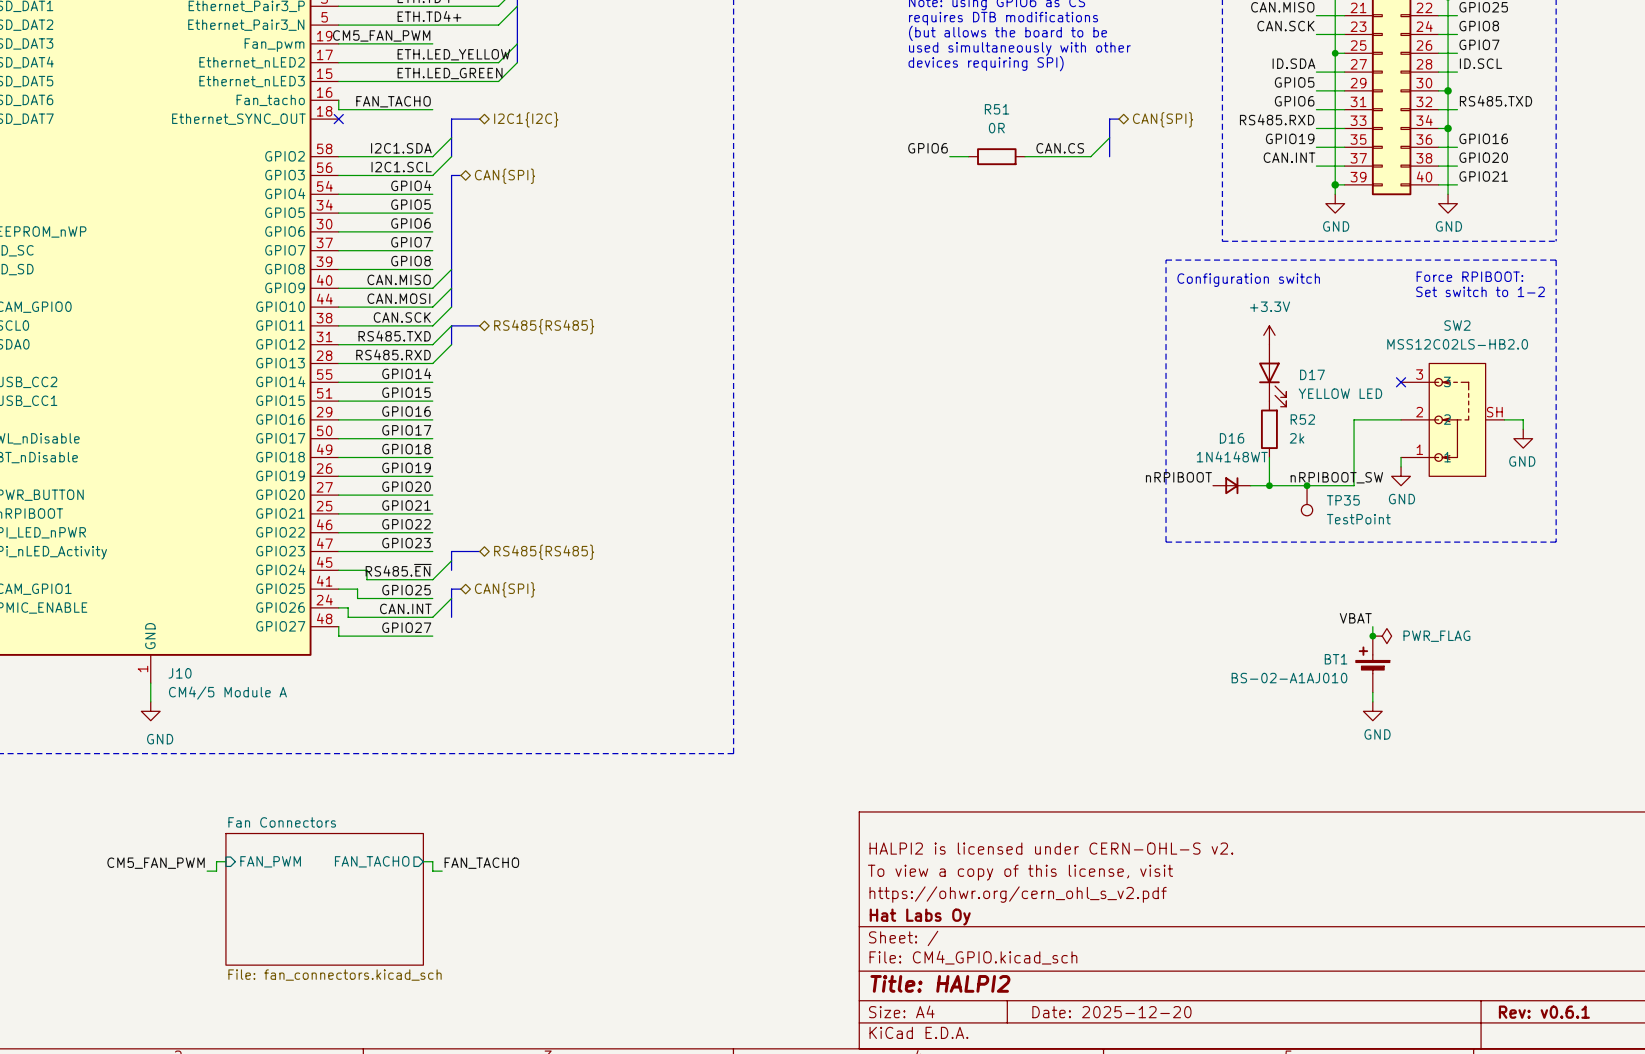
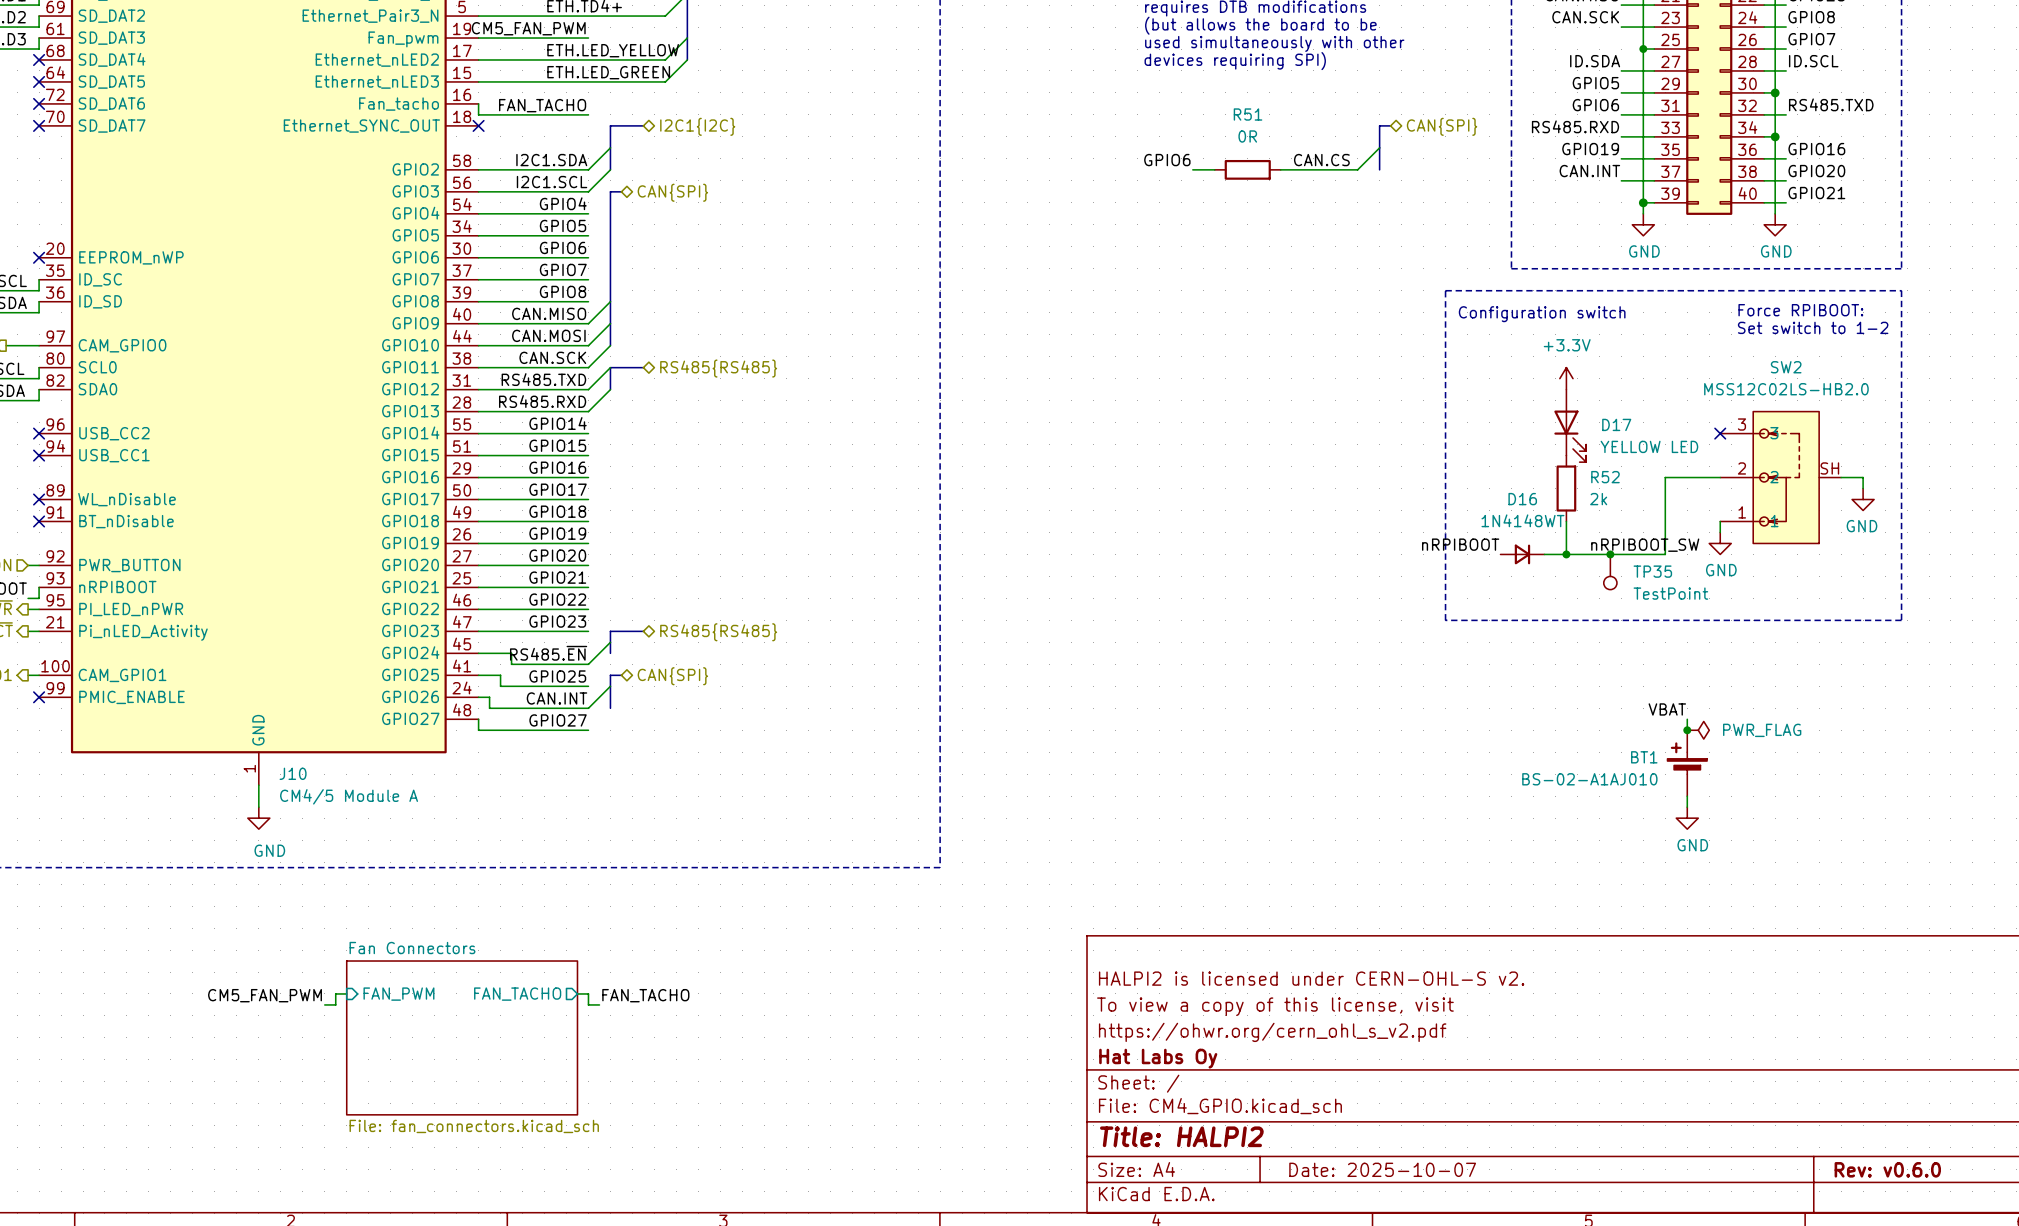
title block: Date: 2025-12-20 (1111, 1012) -> Date: 2025-10-07 (1382, 1169)
title block: Rev: v0.6.1 (1544, 1012) -> Rev: v0.6.0 (1887, 1169)

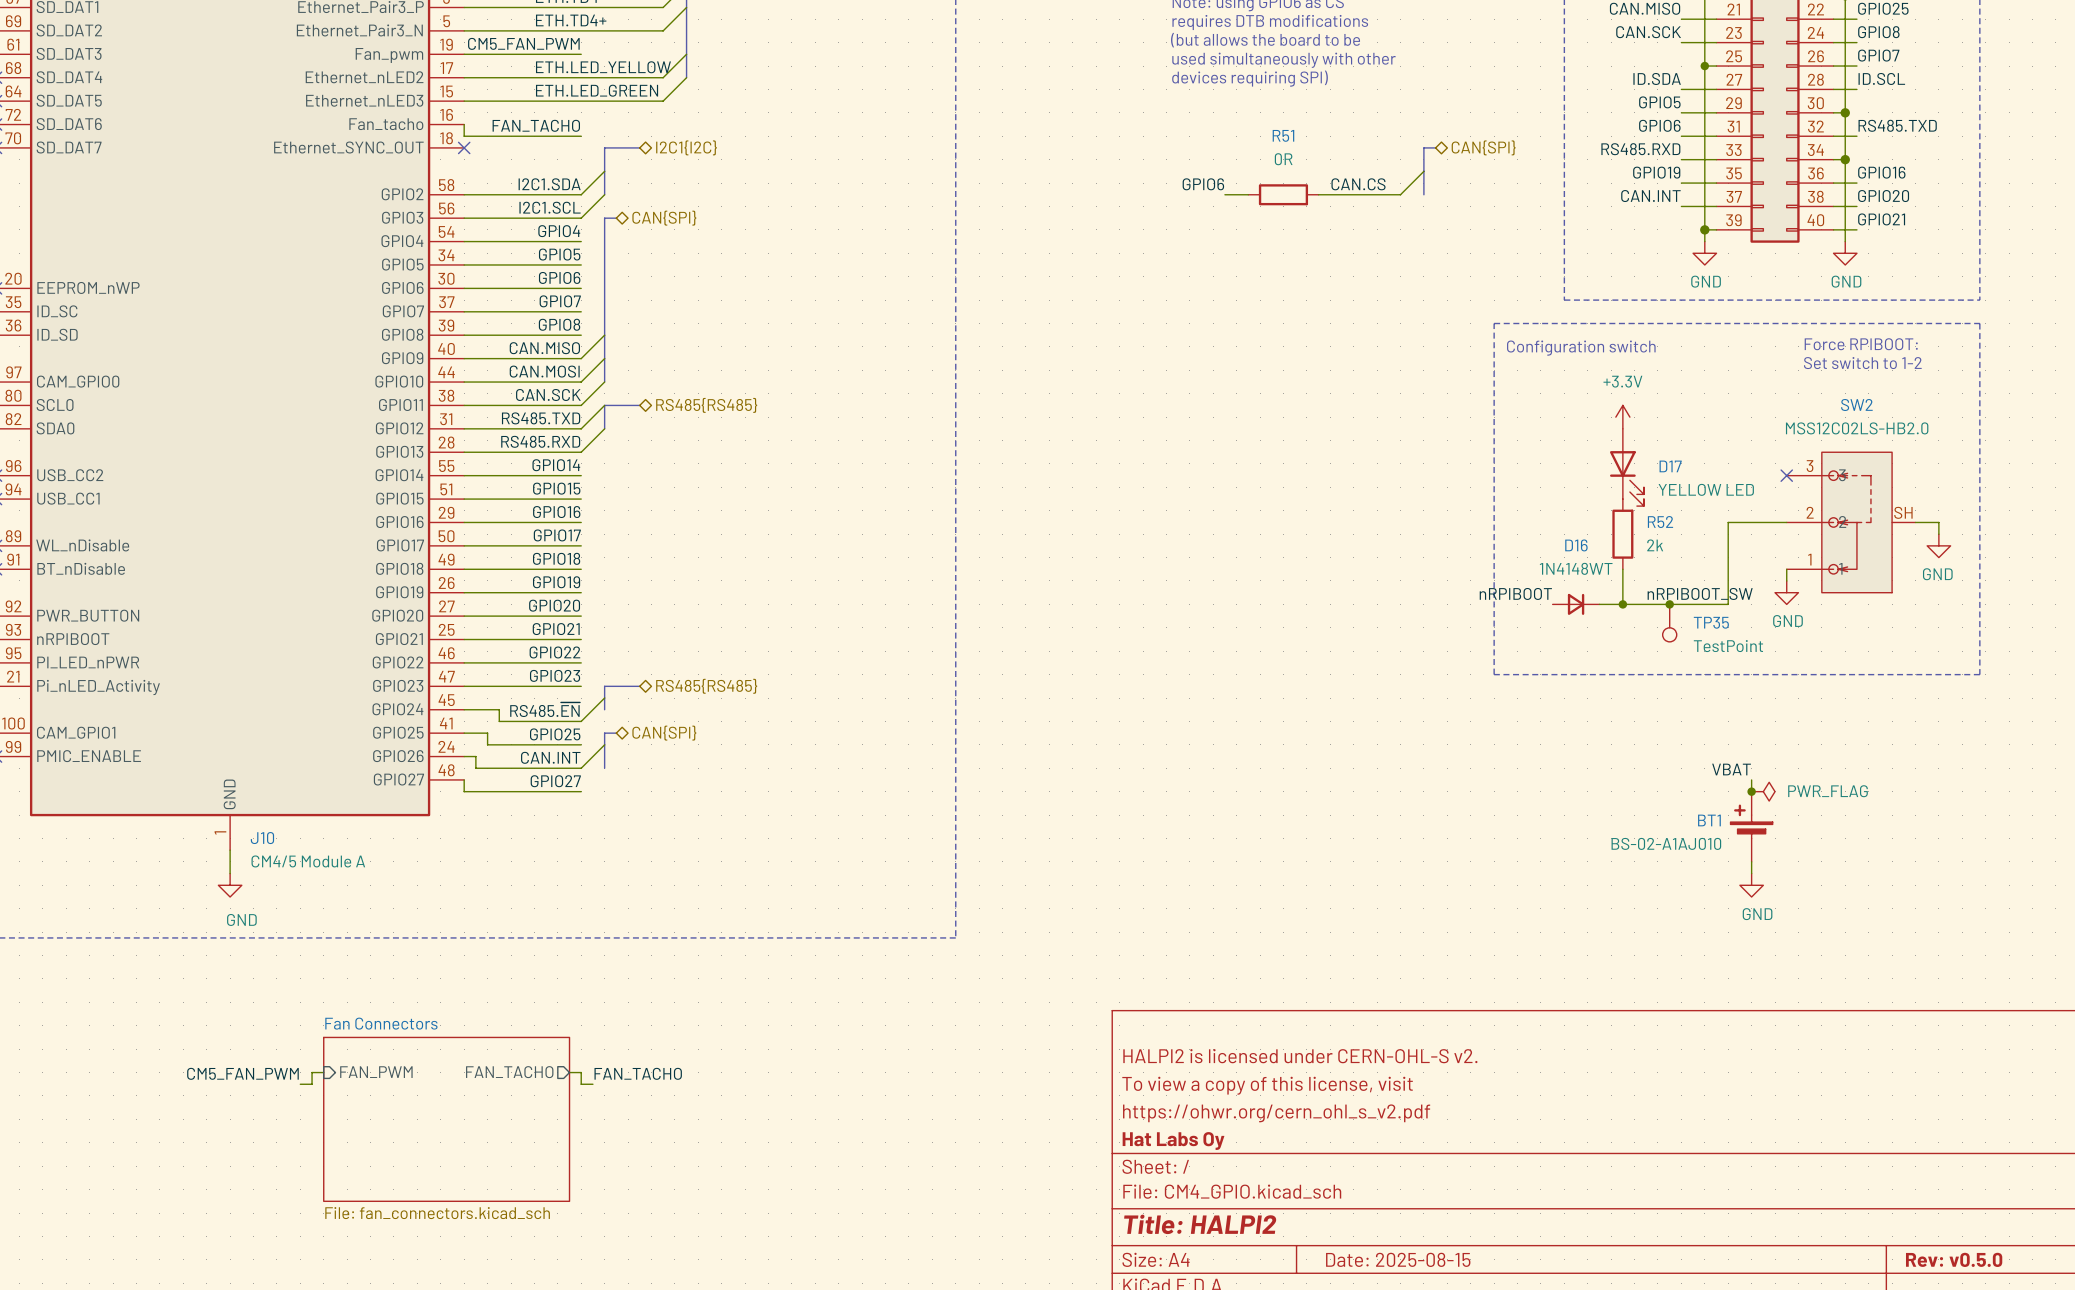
title block: Date: 2025-10-07 (1382, 1169) -> Date: 2025-08-15 (1398, 1259)
title block: Rev: v0.6.0 (1887, 1169) -> Rev: v0.5.0 (1954, 1259)

